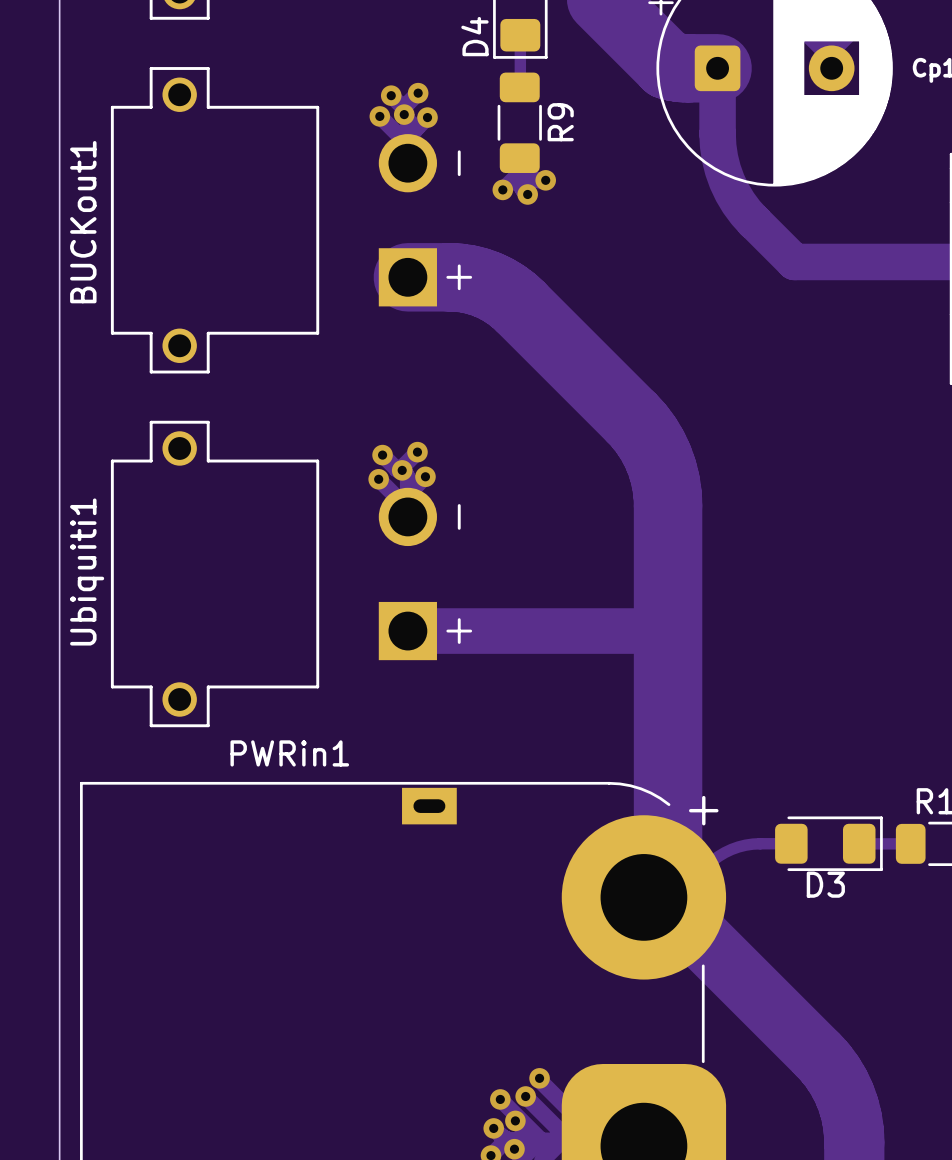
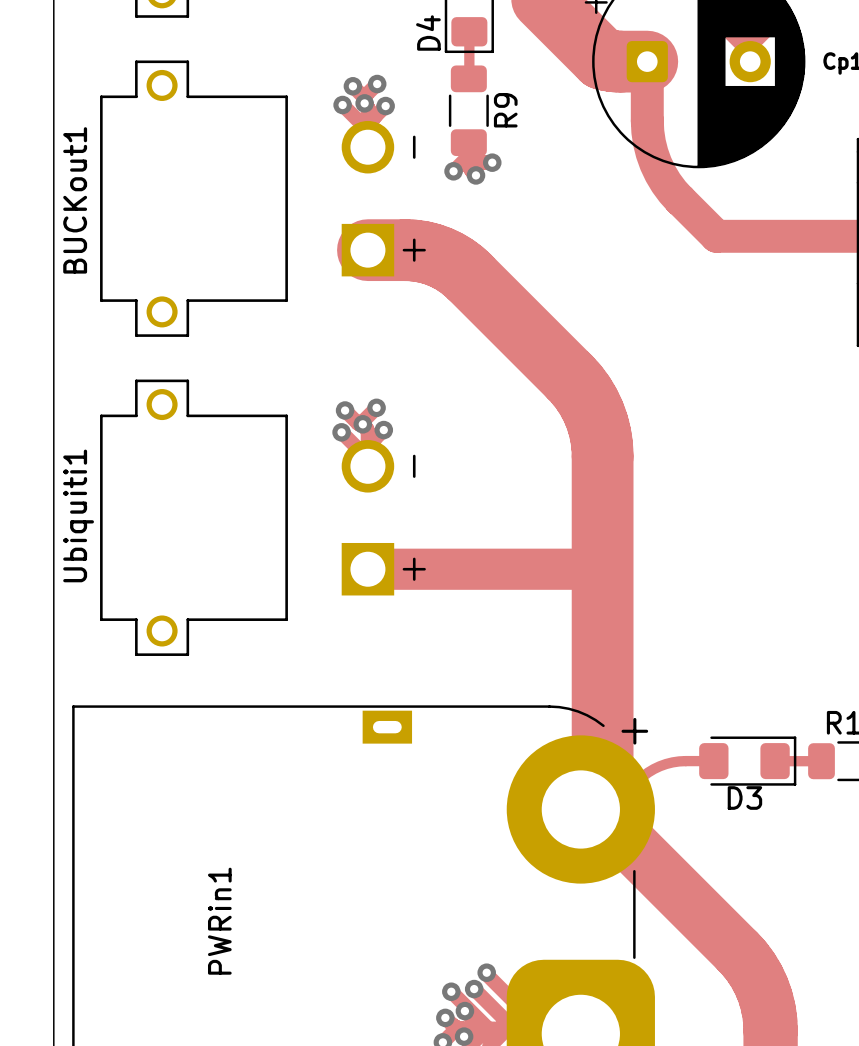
PWRin1 name rotation: 0° (289, 753) -> 90° counterclockwise (219, 921)
PWRin1 name position: PWRin1 (289, 753) -> PWRin1 (219, 921)

